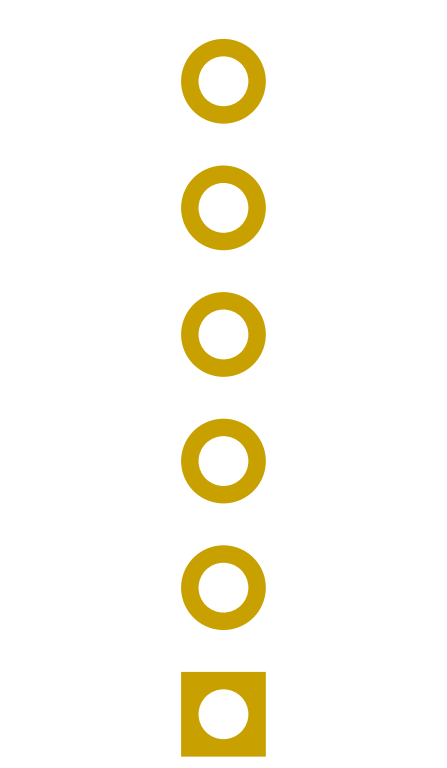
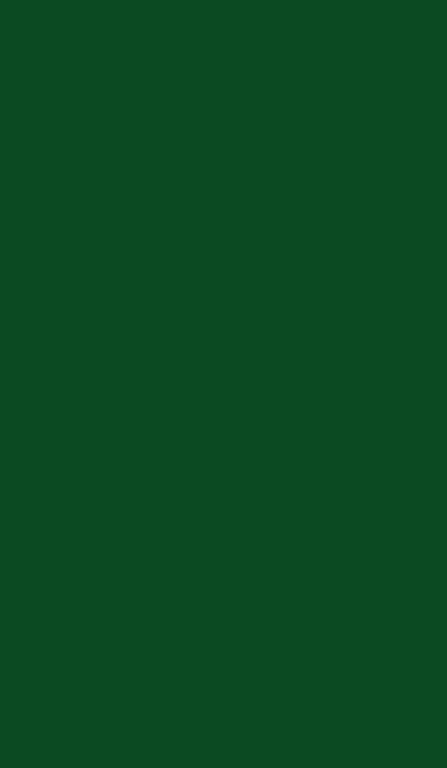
part: (223, 397) -> none

